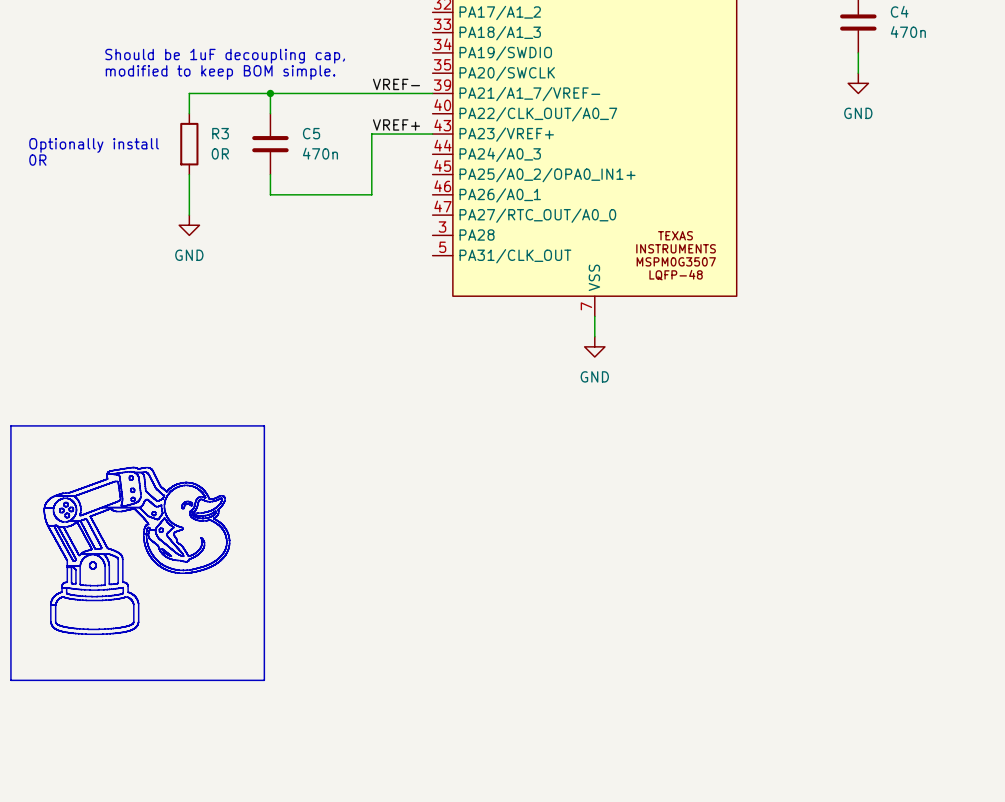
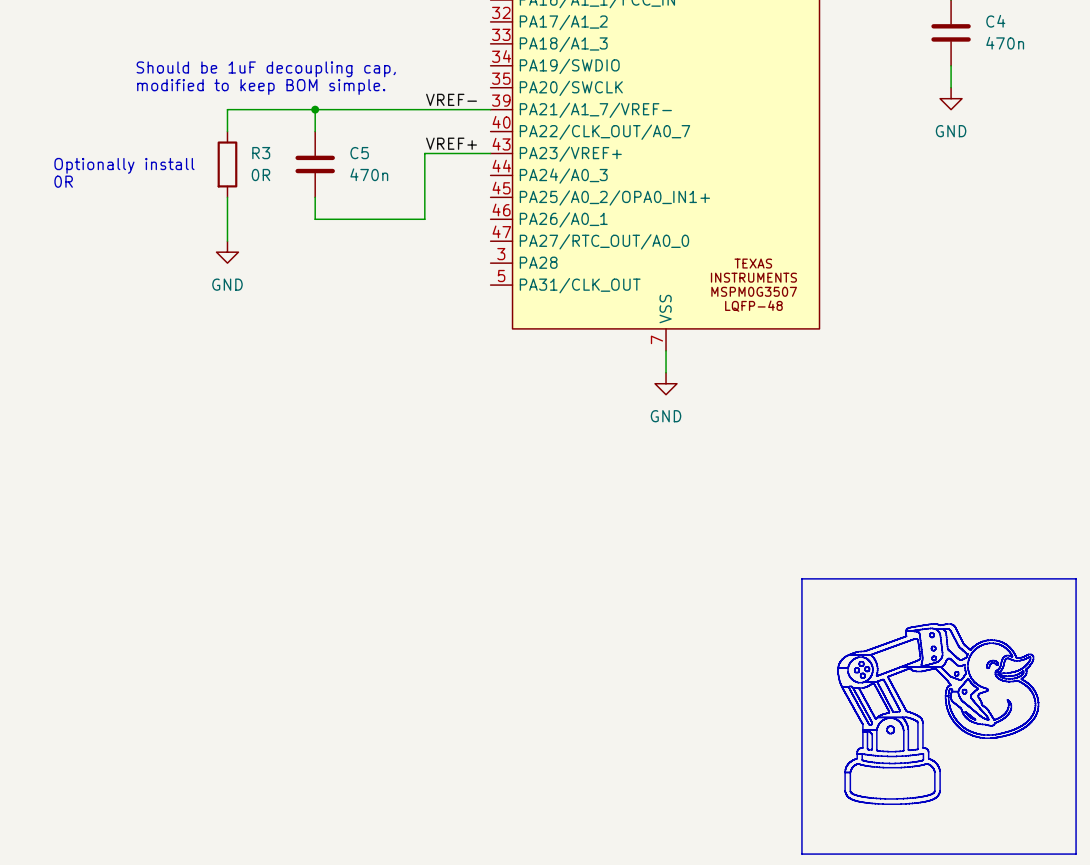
line: (10, 425) (264, 425) (264, 680) (10, 680) (10, 425) -> none
line: (134, 472) (138, 477) (140, 498) (135, 503) (123, 506) (121, 505) (122, 498) (119, 476) (112, 473) -> none
line: (142, 472) (142, 472) (143, 473) (143, 473) (143, 474) (144, 476) (145, 491) (156, 500) (162, 498) (164, 495) (156, 488) (147, 472) (129, 471) (107, 473) -> none
line: (130, 476) (132, 477) (131, 480) (129, 478) (130, 476) -> none
line: (131, 488) (134, 489) (133, 492) (130, 490) (131, 488) -> none
line: (55, 496) (107, 479) (107, 473) (110, 471) (132, 467) (148, 467) (153, 470) (160, 486) (166, 491) (175, 484) (187, 482) (199, 486) (209, 499) (220, 495) (224, 496) (224, 502) (213, 518) (220, 522) (227, 531) (229, 540) (228, 549) (220, 561) (204, 569) (187, 573) (168, 570) (154, 561) (147, 551) (143, 533) (145, 526) (148, 524) (143, 518) (134, 509) (121, 511) (112, 509) -> none
line: (74, 496) (80, 505) (80, 515) (101, 507) (140, 507) (146, 499) (155, 506) (161, 505) (162, 513) (157, 519) (147, 516) (140, 508) (140, 507) (140, 507) (140, 507) -> none
line: (132, 497) (135, 499) (133, 501) (131, 500) (132, 497) -> none
line: (187, 501) (182, 503) (182, 508) (186, 503) (192, 505) (191, 502) (187, 501) -> none
line: (65, 502) (64, 506) (67, 506) (67, 503) (65, 502) -> none
line: (70, 507) (73, 508) (71, 511) (69, 510) (70, 507) -> none
line: (102, 507) (120, 499) (117, 481) (74, 496) (54, 496) (45, 504) (44, 511) (47, 525) (67, 526) (77, 522) (91, 548) (81, 554) -> none
line: (44, 508) (53, 508) (55, 503) (61, 498) (71, 499) (75, 505) (76, 510) (73, 517) (69, 521) -> none
line: (53, 508) (55, 516) (61, 521) (66, 521) (68, 521) (80, 521) (86, 518) (101, 548) (95, 548) (95, 548) (94, 548) (93, 544) (90, 541) (89, 537) (89, 537) (87, 533) (86, 533) (85, 529) (84, 529) (84, 528) (82, 525) (82, 525) (82, 525) (82, 524) (82, 524) (82, 524) (82, 524) (82, 523) (81, 523) (81, 523) (81, 523) (81, 522) (81, 522) (81, 522) (81, 522) (81, 522) (81, 522) (81, 521) (80, 521) (80, 521) (80, 521) (80, 521) -> none
line: (61, 508) (63, 509) (62, 512) (59, 511) (61, 508) -> none
line: (111, 509) (90, 516) (107, 548) (121, 555) (122, 582) (127, 584) (128, 592) (134, 595) (138, 601) (138, 623) (134, 628) (128, 631) (81, 634) (60, 631) (52, 626) (50, 622) (51, 602) (55, 595) (62, 592) (62, 583) (67, 582) (67, 560) (48, 525) -> none
line: (153, 511) (152, 514) (154, 515) (155, 512) (153, 511) -> none
line: (189, 512) (197, 498) (205, 498) (203, 493) (195, 487) (187, 485) (178, 486) (171, 490) (165, 498) (164, 510) (171, 522) (182, 528) (173, 533) (177, 541) (189, 556) (200, 548) (202, 542) (202, 540) (201, 540) (201, 538) (201, 538) (201, 537) (204, 542) (201, 551) (185, 561) (168, 558) (159, 549) -> none
line: (193, 512) (193, 512) (194, 513) (201, 513) (210, 510) (219, 504) (222, 498) (210, 501) (200, 499) (195, 510) (189, 512) (190, 516) (195, 519) (210, 520) (216, 523) (225, 533) (226, 543) (224, 551) (218, 558) (209, 564) (187, 570) (166, 567) (159, 562) (151, 553) (146, 533) -> none
line: (66, 513) (65, 516) (67, 517) (69, 514) (66, 513) -> none
line: (189, 514) (193, 514) (199, 516) (205, 515) (215, 511) (214, 515) (207, 518) (198, 518) (192, 514) -> none
line: (54, 525) (74, 561) (75, 558) (58, 526) -> none
line: (63, 526) (79, 555) (107, 553) (117, 558) (117, 583) (109, 584) (109, 563) (103, 554) -> none
line: none -> (801, 578) (1076, 578) (1076, 854) (801, 854) (801, 578)
line: (160, 528) (159, 531) (161, 532) (163, 529) (160, 528) -> none
line: (149, 530) (147, 527) (146, 533) (143, 533) -> none
line: (155, 530) (155, 531) (155, 532) (156, 535) (160, 539) (176, 553) (183, 556) (166, 535) (173, 527) (164, 518) (155, 530) (149, 530) (148, 534) (149, 539) (158, 545) (159, 549) (162, 549) (171, 556) (164, 550) (162, 549) (162, 549) (162, 549) -> none
line: (92, 562) (96, 564) (93, 569) (89, 566) (92, 562) -> none
line: (67, 565) (80, 565) (86, 556) (97, 555) (104, 563) (105, 584) (80, 584) (80, 584) (80, 565) -> none
line: (67, 567) (72, 566) (75, 569) (75, 584) (71, 582) (71, 567) -> none
line: none -> (935, 629) (940, 634) (942, 657) (936, 662) (923, 666) (921, 665) (922, 657) (919, 633) (912, 630)
line: none -> (943, 629) (943, 629) (944, 629) (944, 629) (944, 630) (944, 630) (945, 631) (946, 633) (947, 649) (959, 659) (966, 657) (967, 653) (959, 646) (949, 629) (930, 628) (906, 630)
line: none -> (930, 633) (933, 634) (932, 637) (930, 636) (930, 633)
line: (62, 587) (67, 587) (81, 589) (98, 590) (123, 587) (123, 593) (106, 596) (80, 596) (67, 593) (66, 593) (66, 587) -> none
line: none -> (932, 646) (935, 647) (934, 650) (931, 648) (932, 646)
line: none -> (849, 654) (906, 636) (906, 629) (909, 627) (933, 623) (940, 625) (950, 624) (955, 627) (963, 644) (970, 650) (980, 642) (992, 640) (1005, 644) (1016, 658) (1028, 654) (1032, 655) (1032, 661) (1026, 669) (1025, 675) (1021, 679) (1028, 683) (1036, 693) (1038, 702) (1037, 712) (1028, 724) (1011, 734) (992, 738) (972, 735) (957, 725) (949, 714) (945, 695) (947, 687) (950, 685) (945, 678) (935, 668) (921, 671) (911, 669)
line: none -> (870, 654) (877, 664) (876, 675) (900, 667) (941, 667) (948, 658) (958, 666) (965, 664) (966, 673) (960, 680) (950, 676) (941, 668) (941, 667) (941, 667) (941, 667)
line: none -> (933, 656) (936, 658) (934, 660) (932, 659) (933, 656)
line: none -> (992, 660) (987, 663) (987, 668) (991, 663) (998, 664) (996, 661) (992, 660)
line: none -> (860, 661) (859, 665) (862, 666) (863, 662) (860, 661)
line: (50, 604) (55, 604) (57, 600) (62, 596) (86, 600) (127, 597) (133, 603) (133, 622) (125, 626) (108, 628) (64, 627) (55, 622) (55, 604) -> none
line: none -> (866, 666) (869, 668) (867, 671) (865, 670) (866, 666)
line: none -> (900, 667) (920, 658) (917, 639) (871, 654) (848, 654) (839, 663) (837, 671) (841, 686) (862, 687) (874, 683) (889, 711) (877, 717)
line: none -> (838, 667) (848, 667) (850, 662) (856, 657) (867, 658) (871, 664) (872, 670) (869, 678) (865, 681)
line: none -> (848, 667) (849, 676) (856, 682) (862, 682) (864, 681) (877, 681) (883, 679) (899, 711) (893, 711) (893, 711) (892, 711) (890, 707) (888, 703) (886, 699) (886, 699) (884, 695) (884, 695) (882, 691) (881, 690) (881, 690) (879, 686) (879, 686) (879, 686) (879, 685) (879, 685) (879, 685) (878, 685) (878, 684) (878, 684) (878, 684) (878, 684) (878, 683) (878, 683) (878, 683) (877, 683) (877, 682) (877, 682) (877, 682) (877, 682) (877, 682) (877, 682) (877, 681)
line: none -> (856, 668) (859, 669) (857, 672) (854, 671) (856, 668)
line: none -> (911, 669) (887, 677) (906, 711) (921, 719) (922, 748) (928, 749) (928, 758) (935, 762) (939, 769) (939, 793) (935, 798) (928, 801) (905, 803) (878, 803) (856, 801) (847, 796) (845, 790) (845, 769) (849, 762) (857, 758) (858, 749) (862, 748) (862, 724) (842, 686)
line: none -> (955, 671) (954, 674) (957, 675) (958, 672) (955, 671)
line: none -> (995, 672) (999, 668) (1004, 656) (1012, 656) (1009, 651) (1002, 645) (993, 643) (983, 644) (975, 649) (969, 657) (968, 669) (975, 683) (987, 689) (978, 695) (981, 704) (994, 719) (1006, 711) (1008, 705) (1008, 702) (1008, 702) (1008, 700) (1007, 700) (1007, 699) (1011, 704) (1008, 714) (990, 725) (972, 722) (962, 712)
line: none -> (999, 672) (999, 672) (1000, 673) (1008, 673) (1018, 670) (1028, 663) (1030, 657) (1017, 661) (1007, 658) (1001, 670) (995, 672) (996, 676) (1001, 680) (1017, 680) (1024, 684) (1033, 695) (1035, 705) (1033, 714) (1026, 722) (1016, 728) (992, 735) (970, 731) (962, 726) (954, 716) (950, 708) (948, 695)
line: none -> (862, 673) (860, 676) (863, 678) (865, 675) (862, 673)
line: none -> (995, 674) (999, 674) (1005, 676) (1012, 676) (1023, 671) (1021, 675) (1014, 678) (1004, 678) (998, 674)
line: none -> (849, 686) (868, 724) (871, 725) (872, 722) (853, 687)
line: none -> (859, 687) (875, 719) (906, 717) (917, 722) (917, 749) (908, 749) (908, 727) (902, 717)
line: none -> (963, 689) (962, 692) (965, 693) (966, 690) (963, 689)
line: none -> (951, 691) (950, 688) (948, 695) (945, 695)
line: none -> (958, 691) (958, 693) (958, 694) (959, 696) (963, 702) (981, 716) (988, 719) (970, 697) (978, 688) (968, 678) (958, 691) (951, 691) (950, 695) (952, 701) (961, 708) (962, 712) (965, 712) (975, 719) (967, 713) (966, 712) (965, 712) (965, 712)
line: none -> (889, 726) (894, 728) (891, 733) (887, 730) (889, 726)
line: none -> (862, 730) (877, 730) (878, 724) (883, 719) (895, 719) (903, 727) (903, 750) (877, 750) (876, 750) (876, 730)
line: none -> (862, 731) (868, 731) (872, 734) (871, 749) (867, 748) (867, 731)
line: none -> (857, 753) (862, 753) (877, 756) (896, 756) (923, 753) (923, 759) (904, 763) (876, 762) (862, 760) (862, 759) (862, 753)
line: none -> (845, 772) (850, 772) (852, 767) (857, 763) (883, 767) (907, 767) (928, 764) (934, 770) (934, 791) (926, 796) (907, 798) (860, 796) (850, 791) (850, 772)

